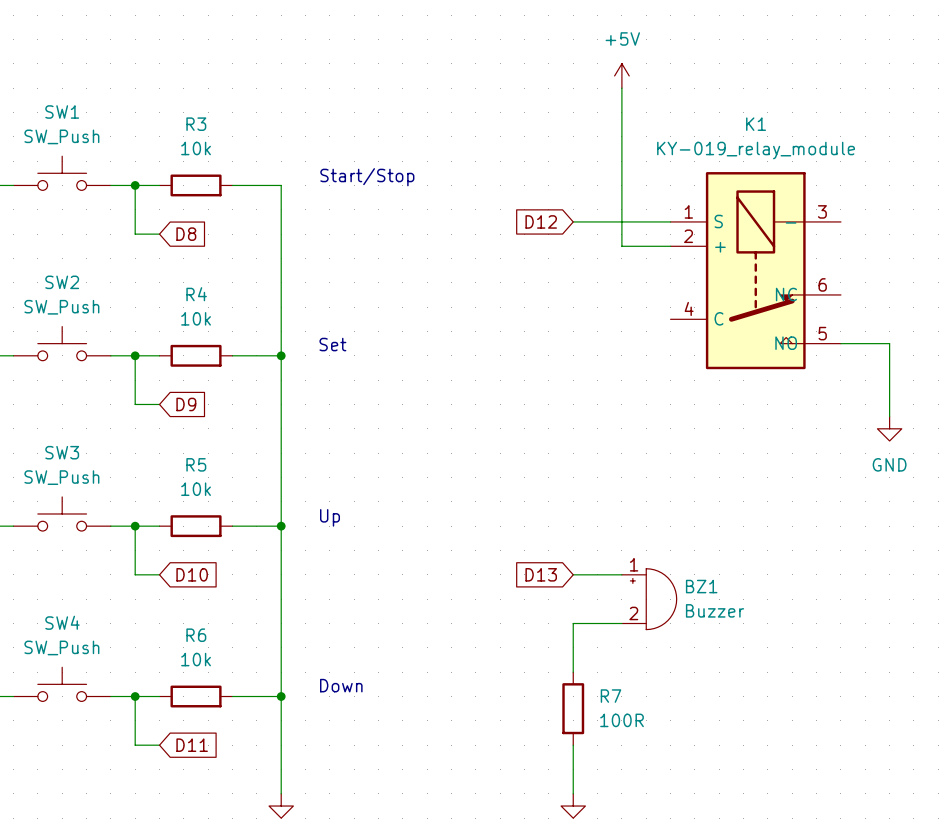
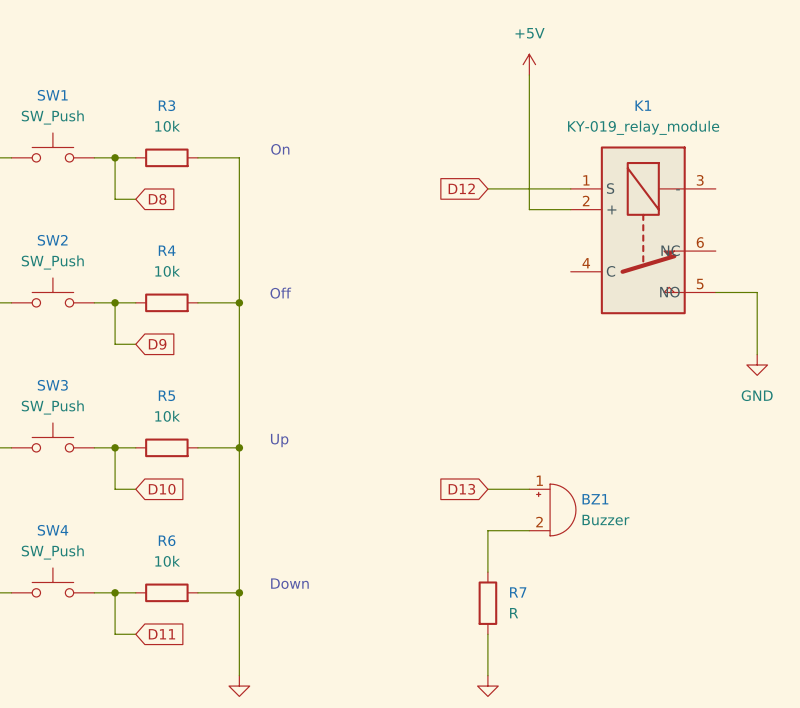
text: Start/Stop (367, 177) -> On (280, 149)
text: Set (332, 344) -> Off (280, 293)
R7 value: 100R (622, 720) -> R (514, 613)

